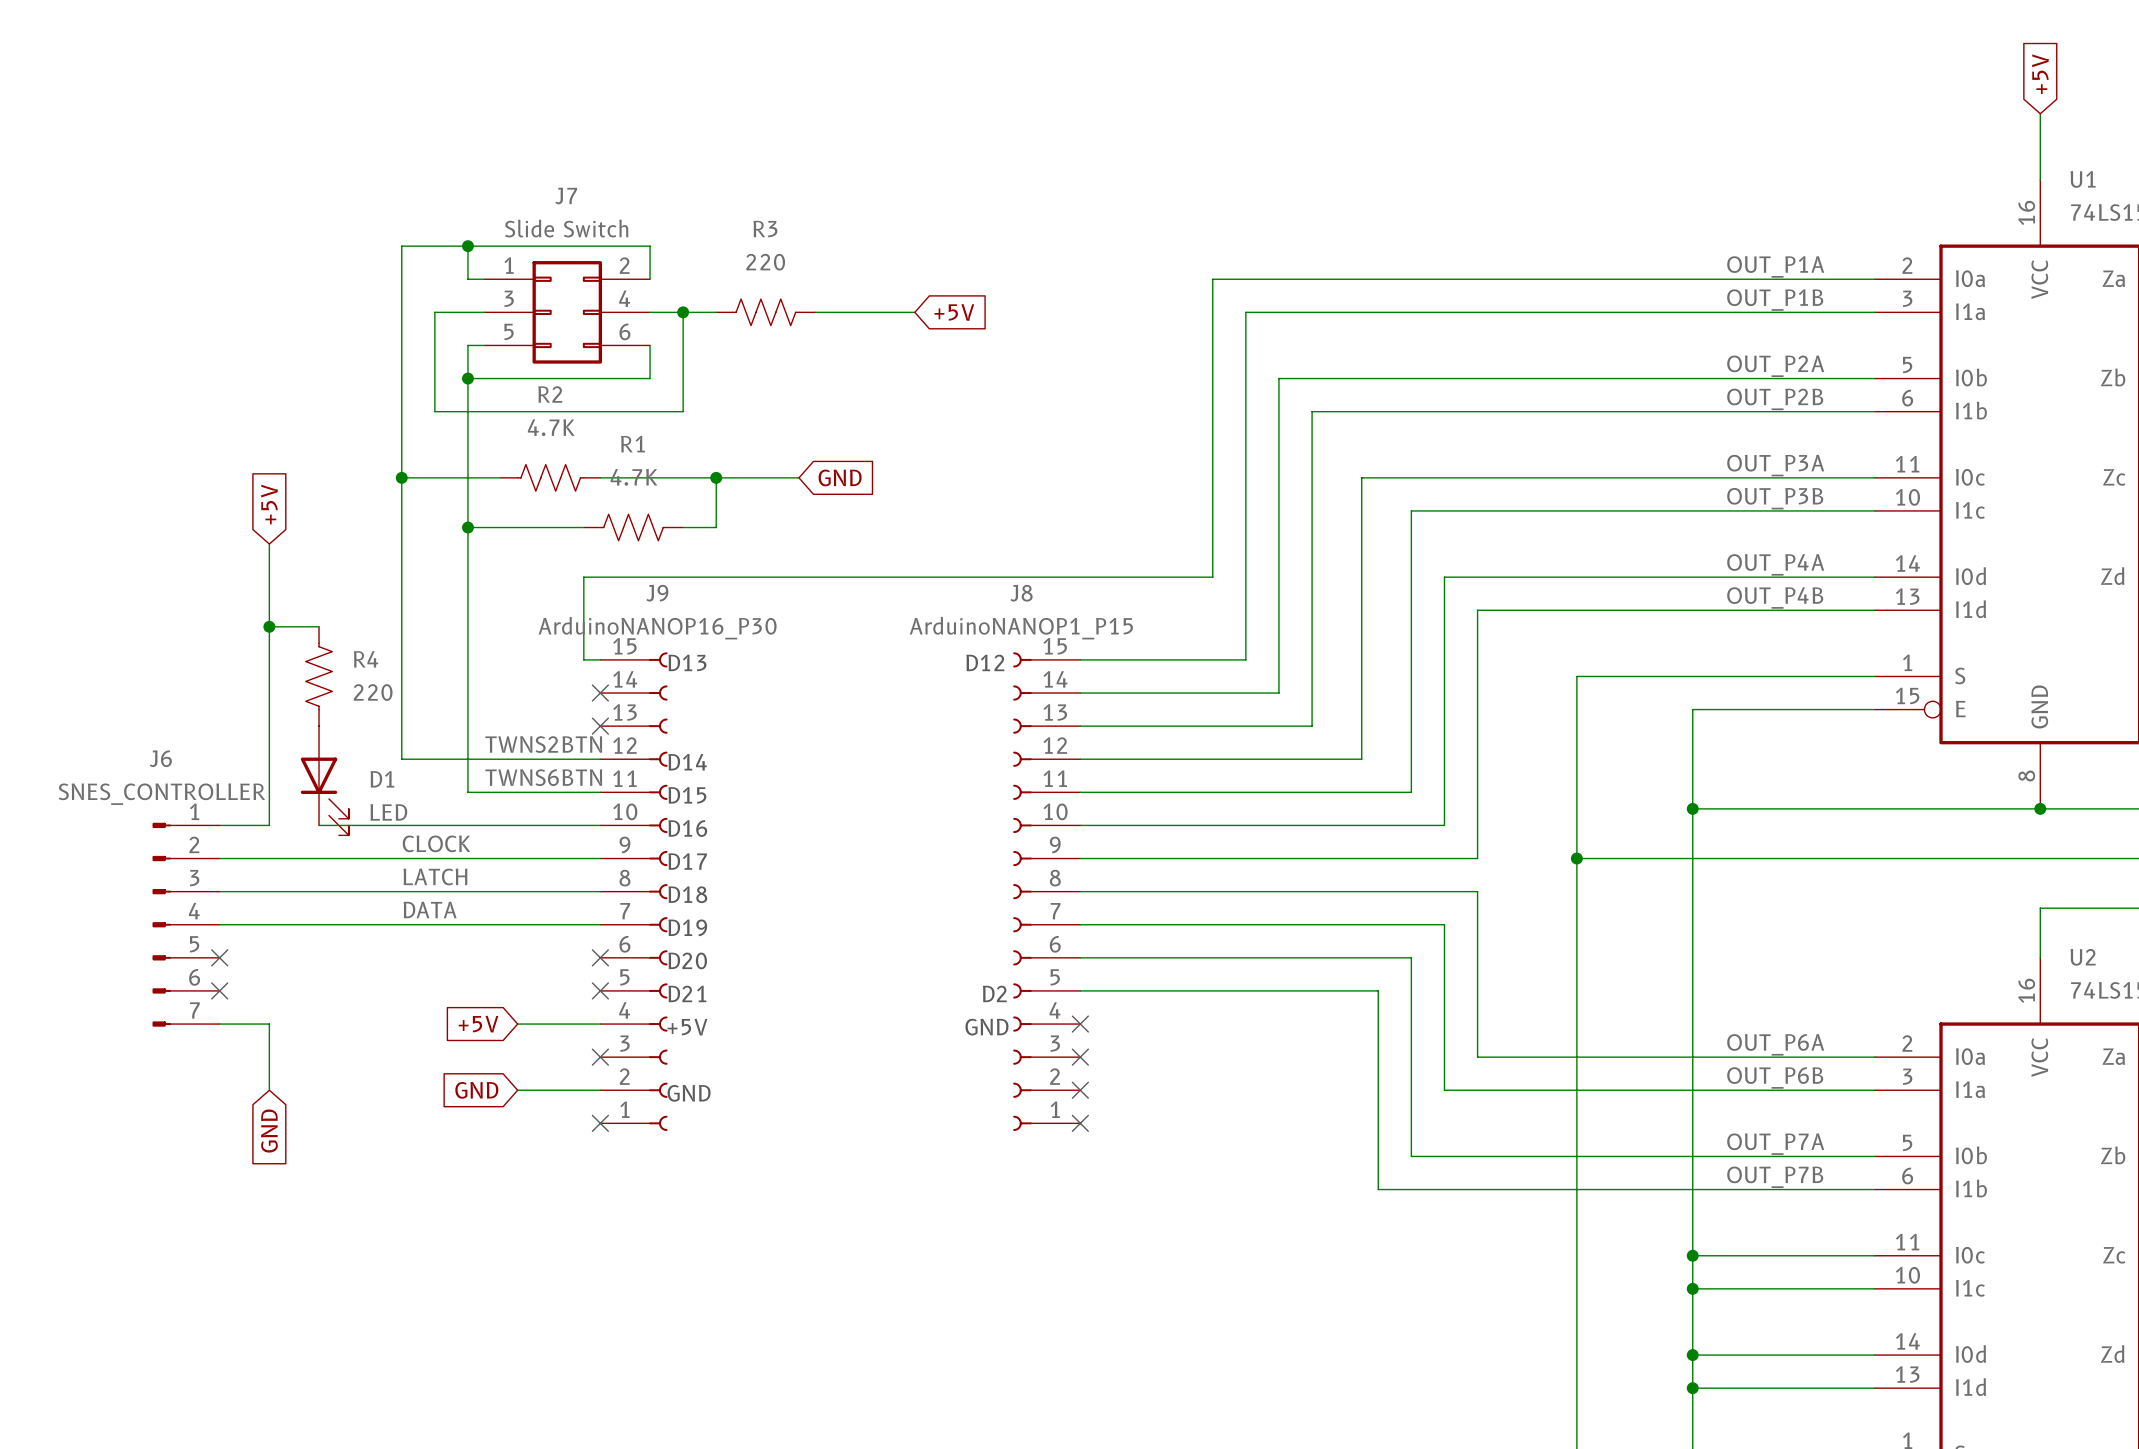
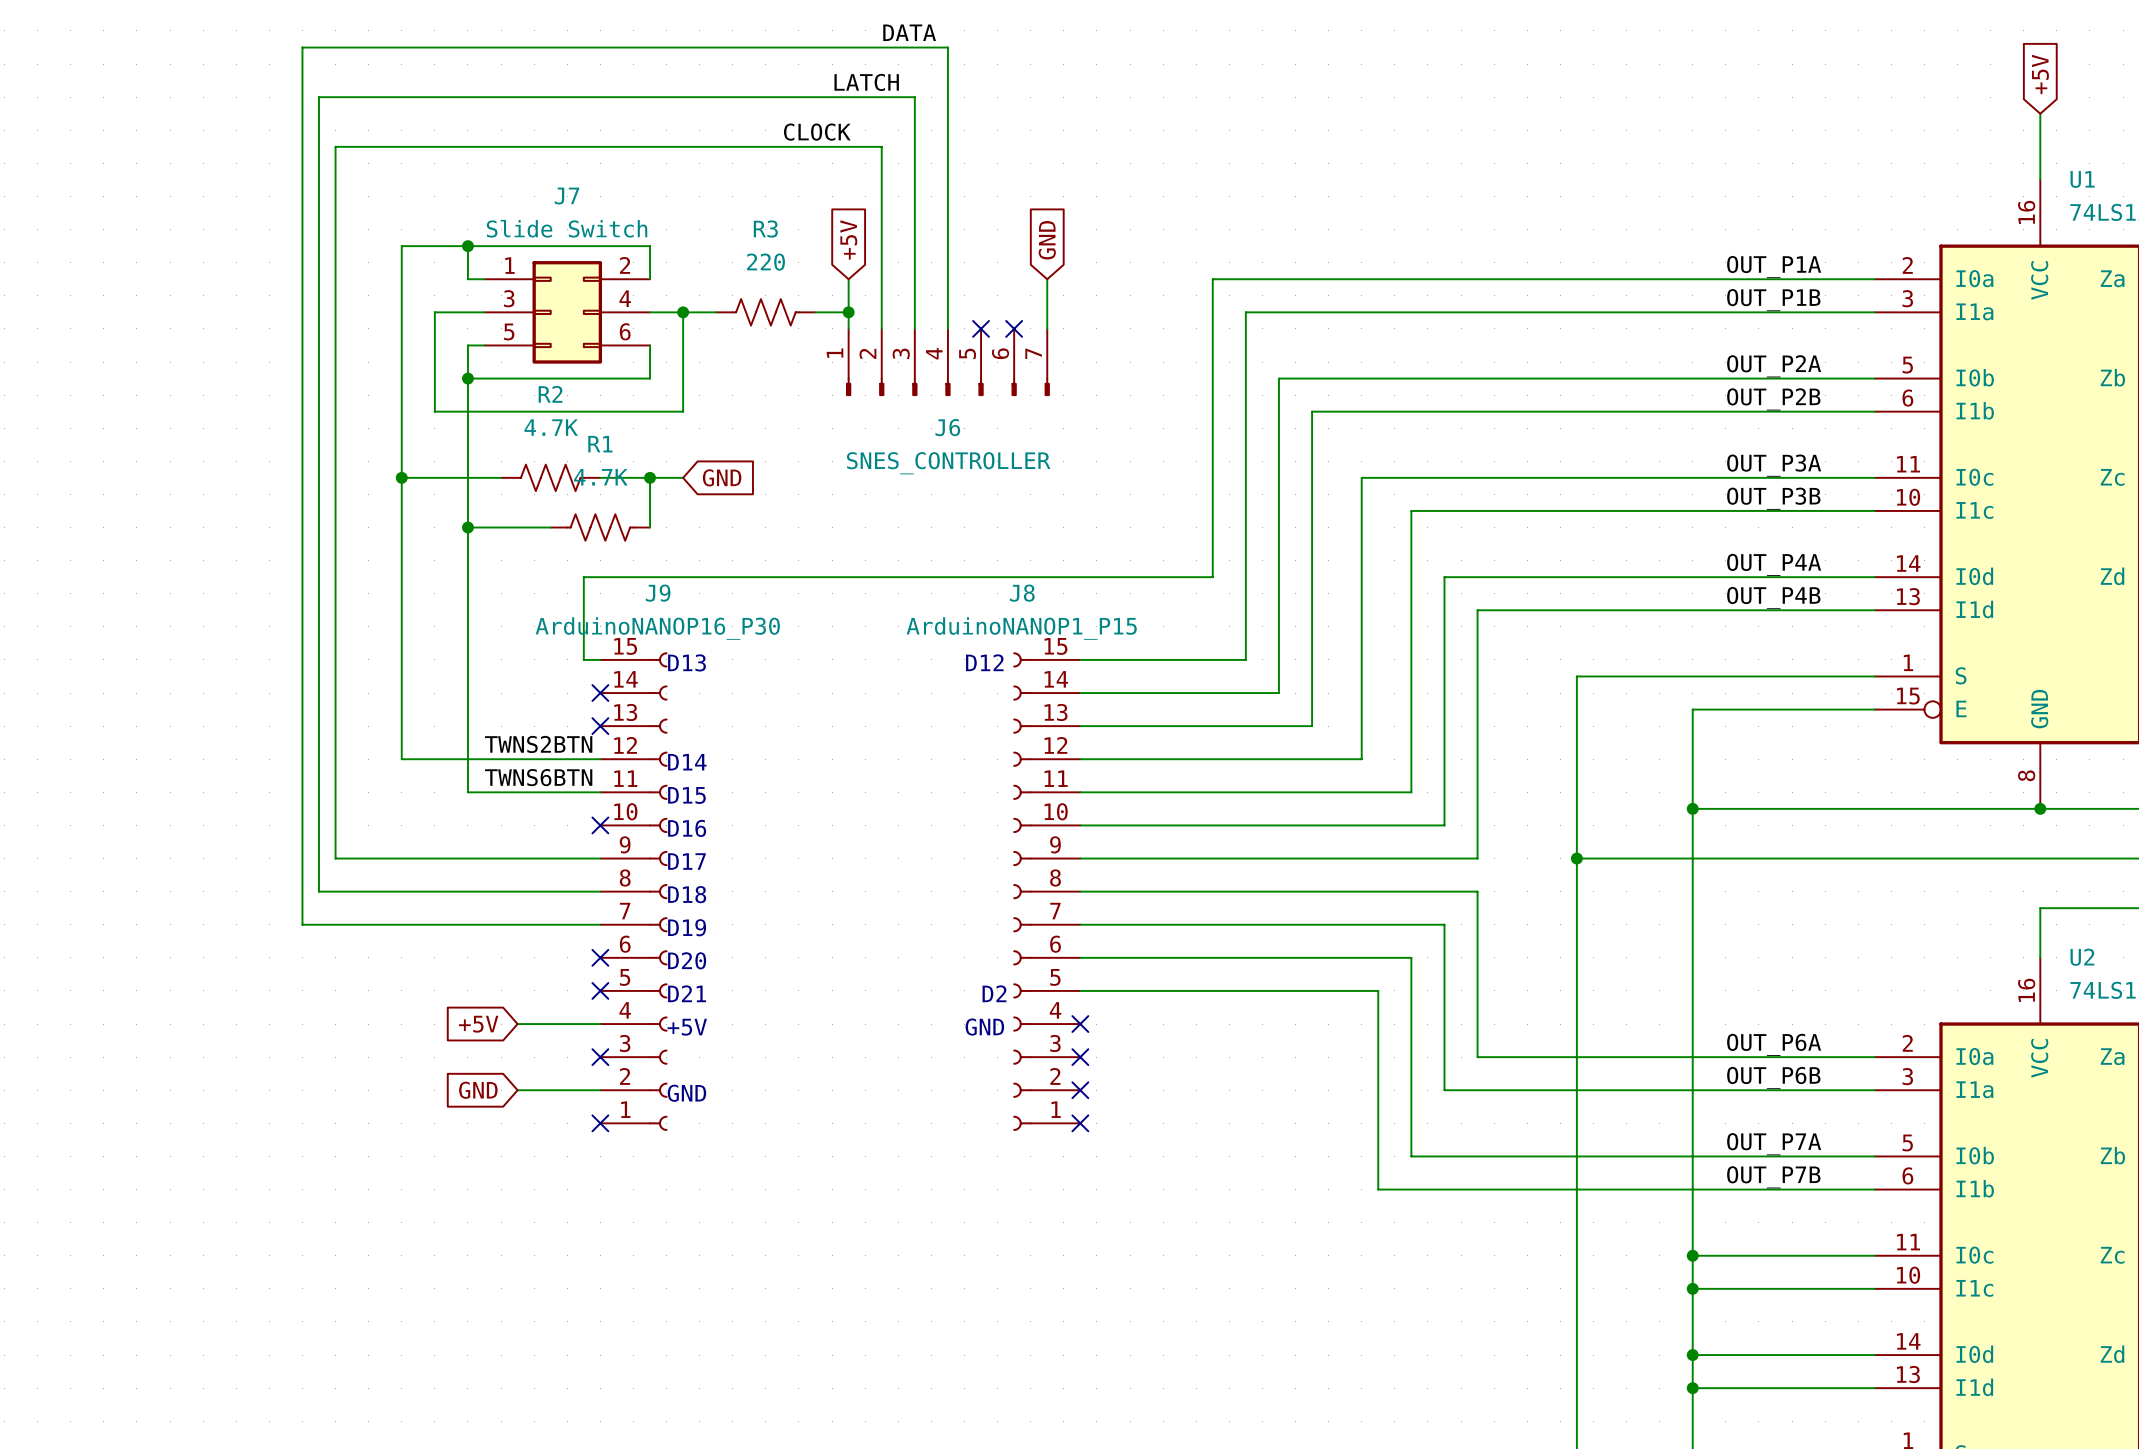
label: none -> DATA (909, 32)
label: none -> LATCH (866, 82)
label: none -> CLOCK (817, 132)
global label: none -> GND (1047, 240)
wire: none -> (848, 279) (848, 328)
wire: none -> (1047, 279) (1047, 328)
wire: (848, 312) (914, 312) -> none
junction: none -> (848, 312)
global label rotation: 0° (954, 312) -> 90° counterclockwise (848, 239)
global label position: +5V (954, 312) -> +5V (848, 239)
no-connect mark: none -> (981, 328)
no-connect mark: none -> (1014, 328)
wire: none -> (650, 477) (650, 527)
wire: (683, 477) (798, 477) -> none
wire: (716, 477) (716, 527) (683, 527) -> none
junction position: (716, 477) -> (650, 477)
global label position: GND (840, 477) -> GND (722, 477)
global label: +5V (269, 504) -> none
R1 position: (633, 527) -> (600, 527)
wire: (269, 544) (269, 825) (219, 825) -> none
wire: (269, 626) (319, 626) -> none
junction: (269, 626) -> none
R4: 220 (319, 676) -> none
J6 name position: J6 (160, 758) -> J6 (947, 427)
D1: LED (324, 780) -> none
J6 value position: SNES_CONTROLLER (161, 794) -> SNES_CONTROLLER (948, 463)
wire: (319, 825) (600, 825) -> none
no-connect mark: none -> (600, 825)
label: CLOCK (436, 843) -> none
wire: (219, 858) (335, 858) -> (881, 328) (881, 146) (335, 146) (335, 858)
label: LATCH (435, 876) -> none
wire: (219, 891) (319, 891) -> (914, 328) (914, 97) (319, 97) (319, 891)
label: DATA (430, 909) -> none
J6 rotation: 0° (161, 924) -> 90° counterclockwise (947, 386)
J6 position: (186, 924) -> (947, 362)
wire: (219, 924) (302, 924) -> (947, 328) (947, 47) (302, 47) (302, 924)
no-connect mark: (219, 957) -> none
no-connect mark: (219, 990) -> none
wire: (219, 1024) (269, 1024) (269, 1090) -> none
global label: GND (269, 1131) -> none

